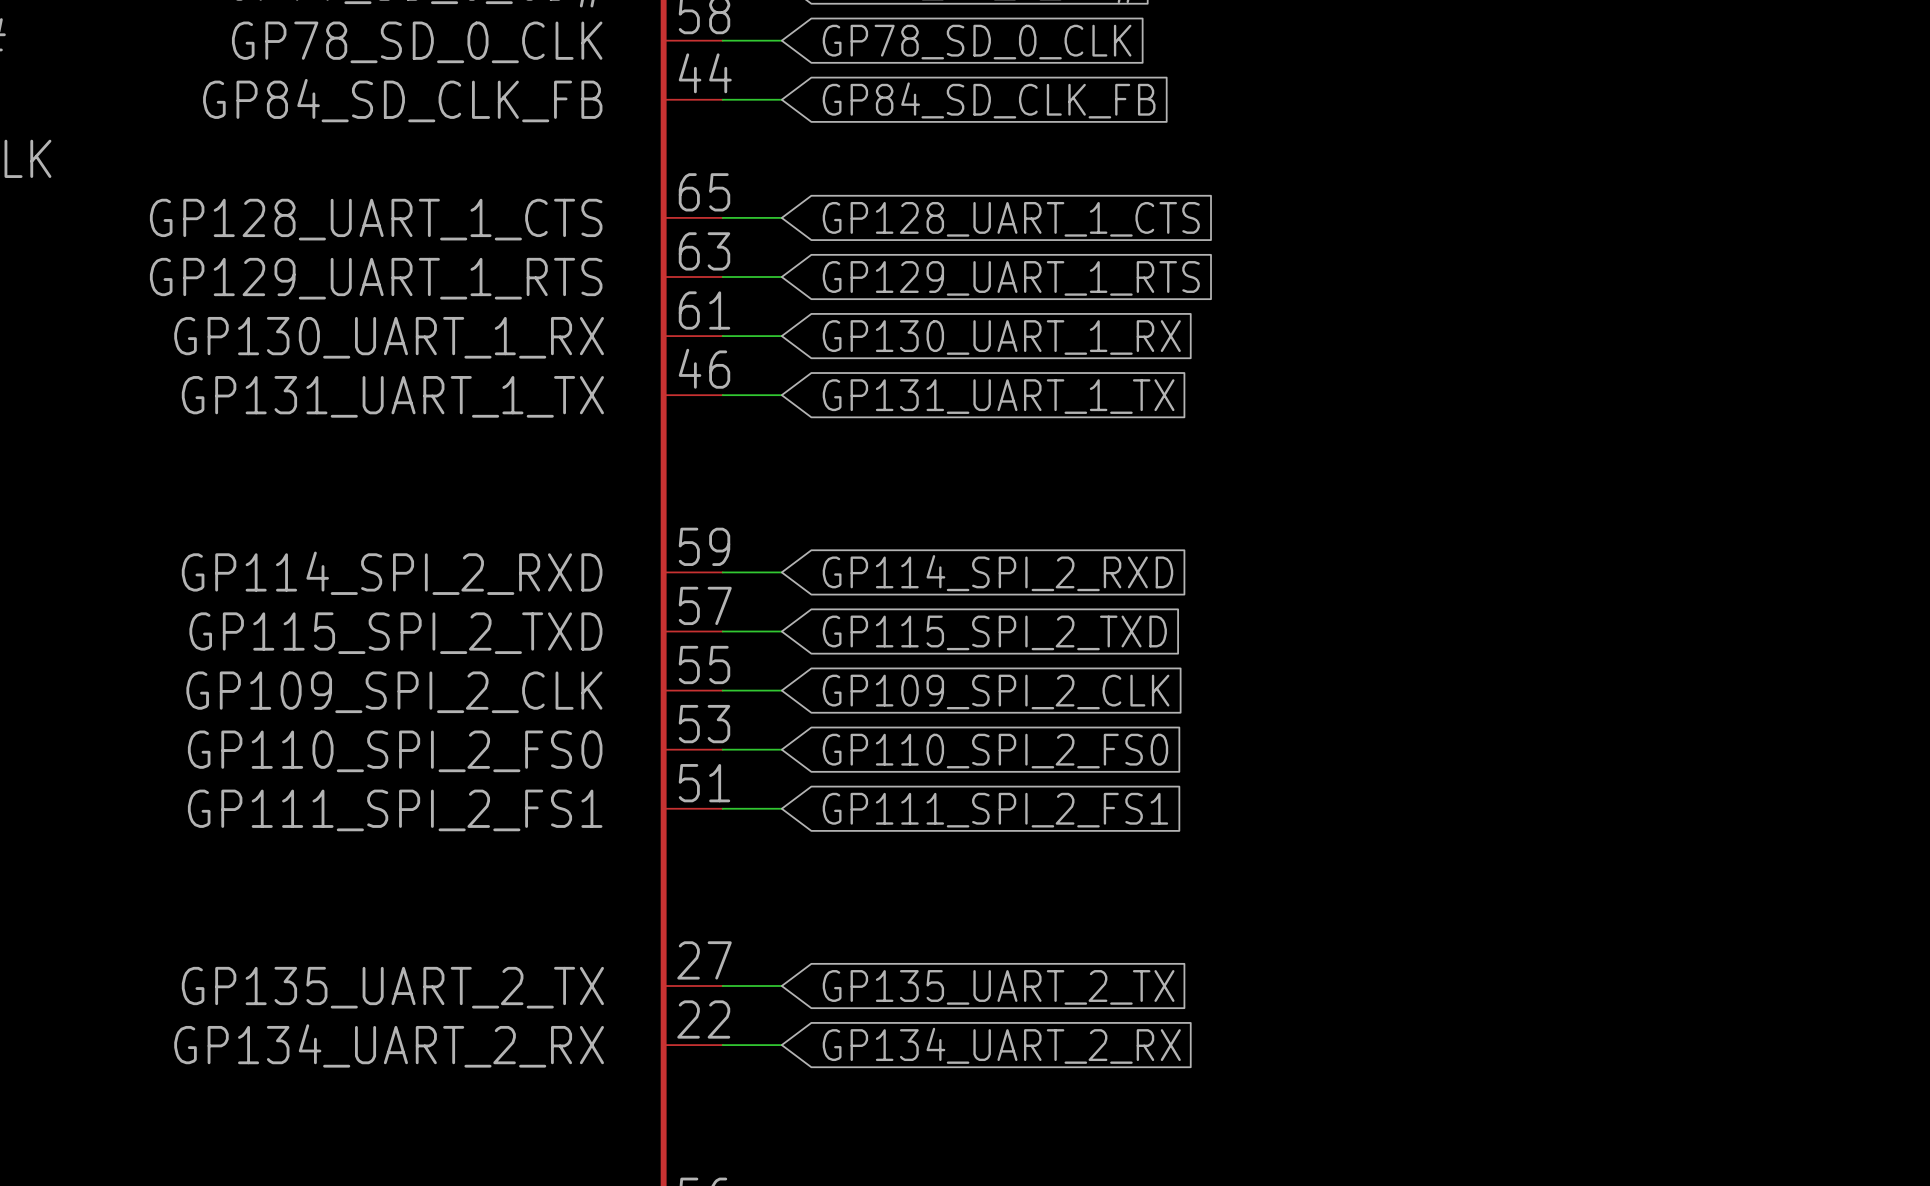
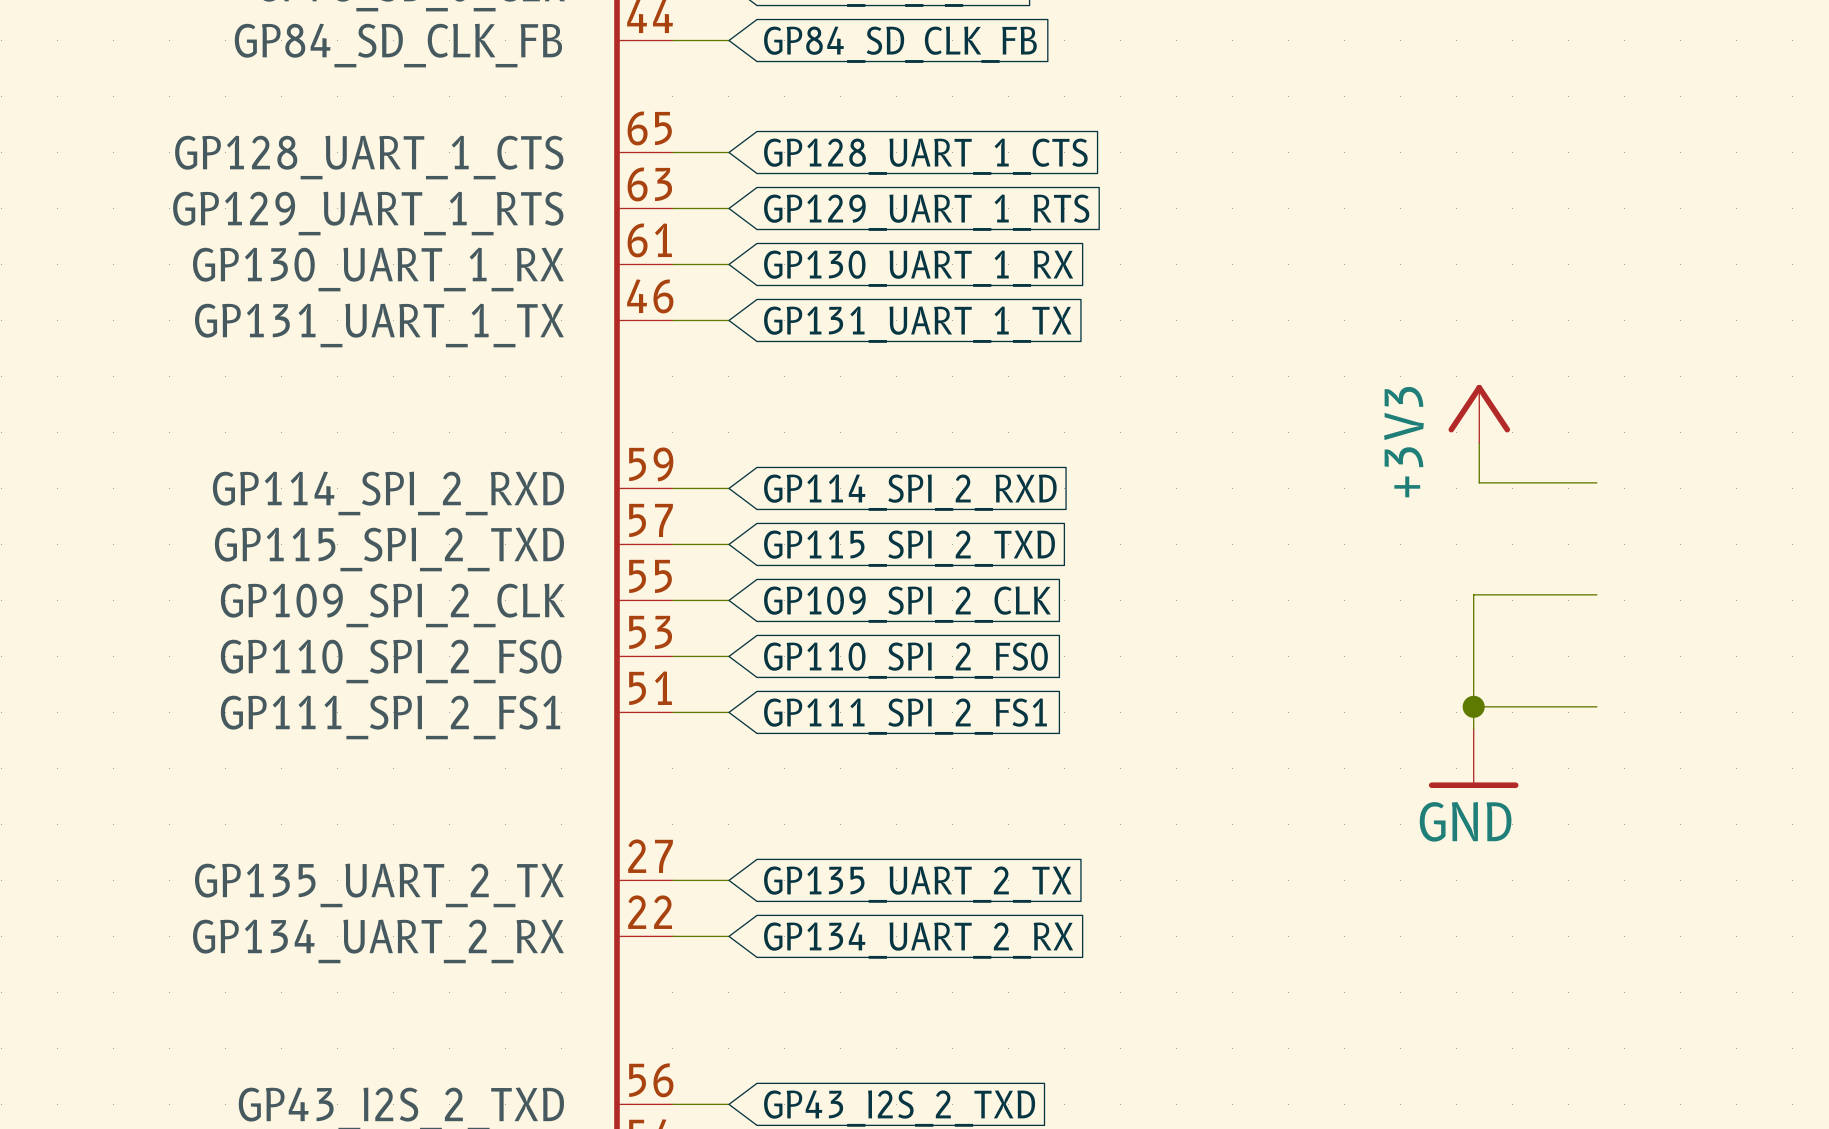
power symbol: none -> +3V3 (1479, 414)
wire: none -> (1479, 443) (1479, 482) (1596, 482)
wire: none -> (1596, 594) (1473, 594) (1473, 729)
wire: none -> (1473, 706) (1596, 706)
junction: none -> (1473, 706)
power symbol: none -> GND (1473, 758)

